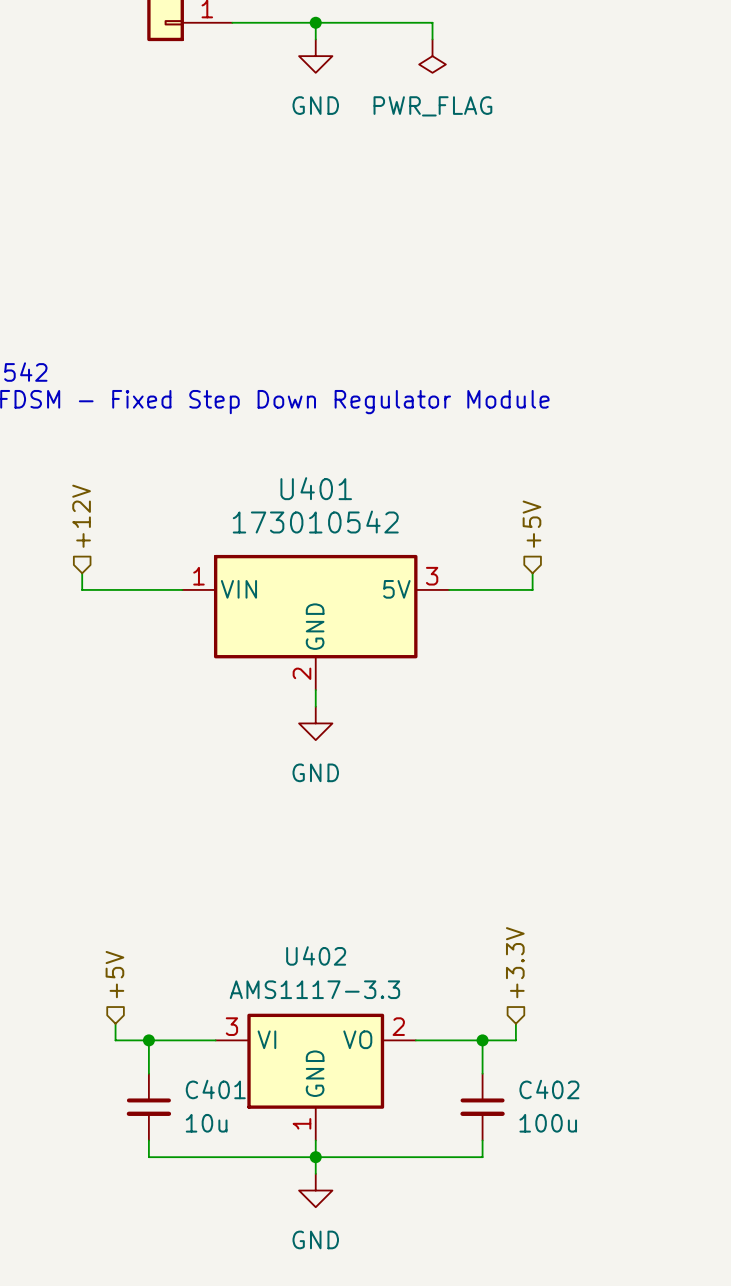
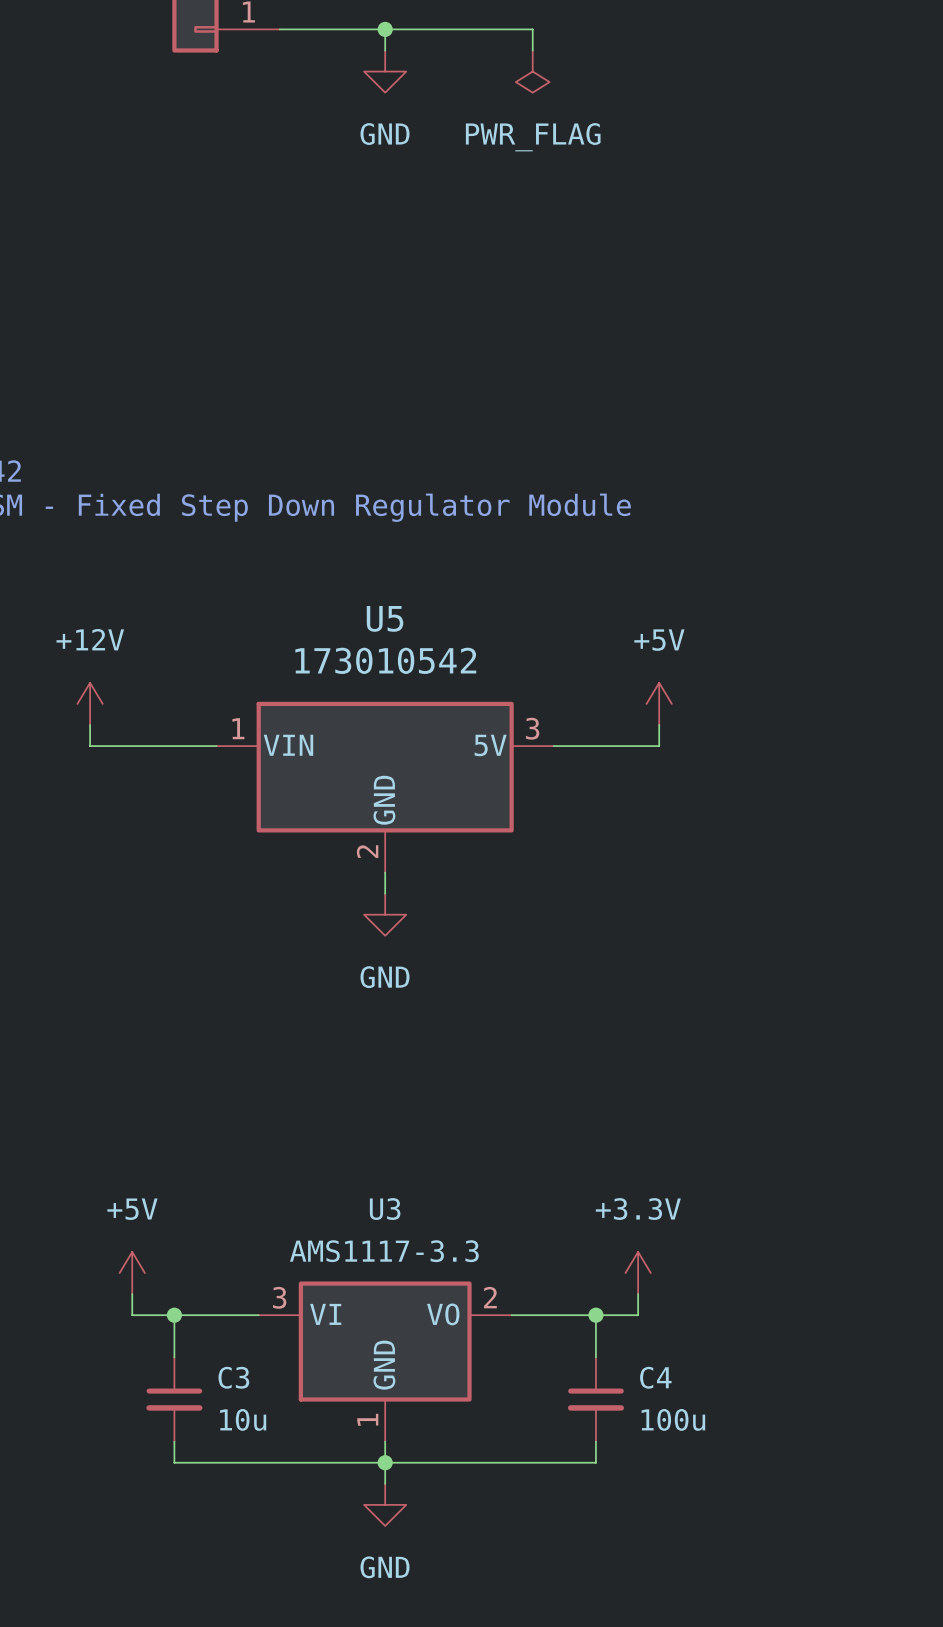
U401 name: U401 (316, 488) -> U5 (385, 618)
hierarchical label: +12V (81, 516) -> none
hierarchical label: +5V (531, 524) -> none
power symbol: none -> +12V (90, 703)
power symbol: none -> +5V (659, 703)
U402 name: U402 (316, 955) -> U3 (385, 1209)
hierarchical label: +3.3V (515, 962) -> none
hierarchical label: +5V (114, 974) -> none
power symbol: none -> +5V (132, 1273)
power symbol: none -> +3.3V (638, 1273)
C401 name: C401 (215, 1089) -> C3 (233, 1377)
C402 name: C402 (549, 1089) -> C4 (655, 1377)

